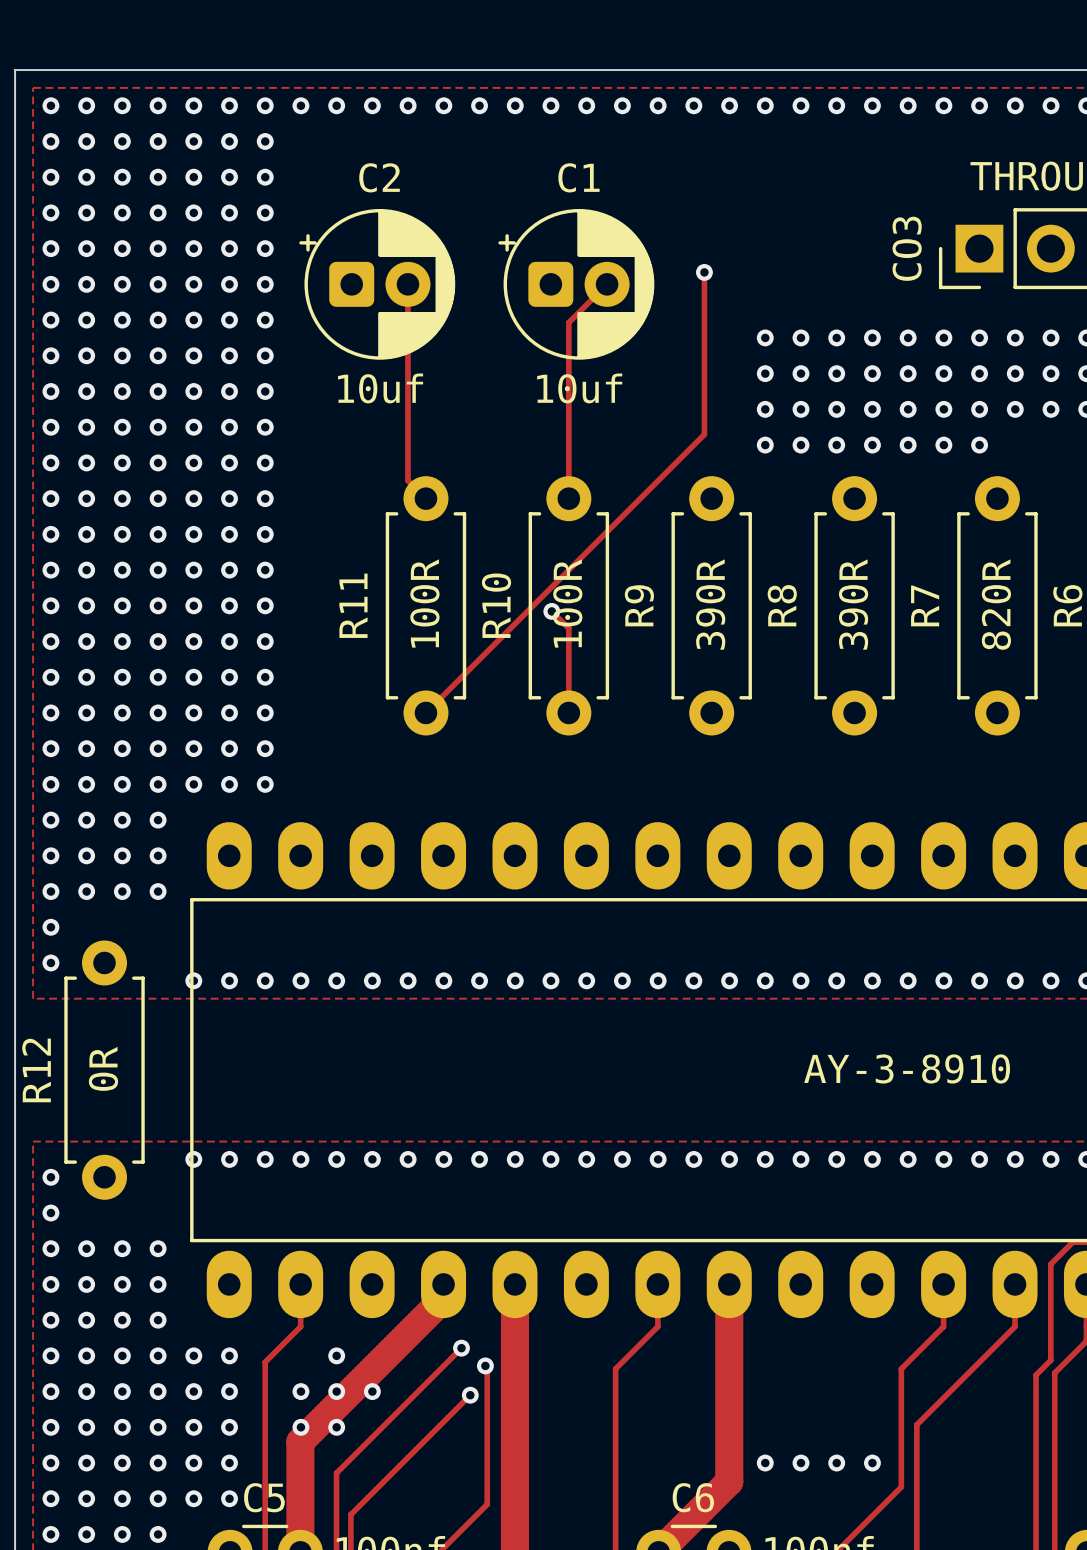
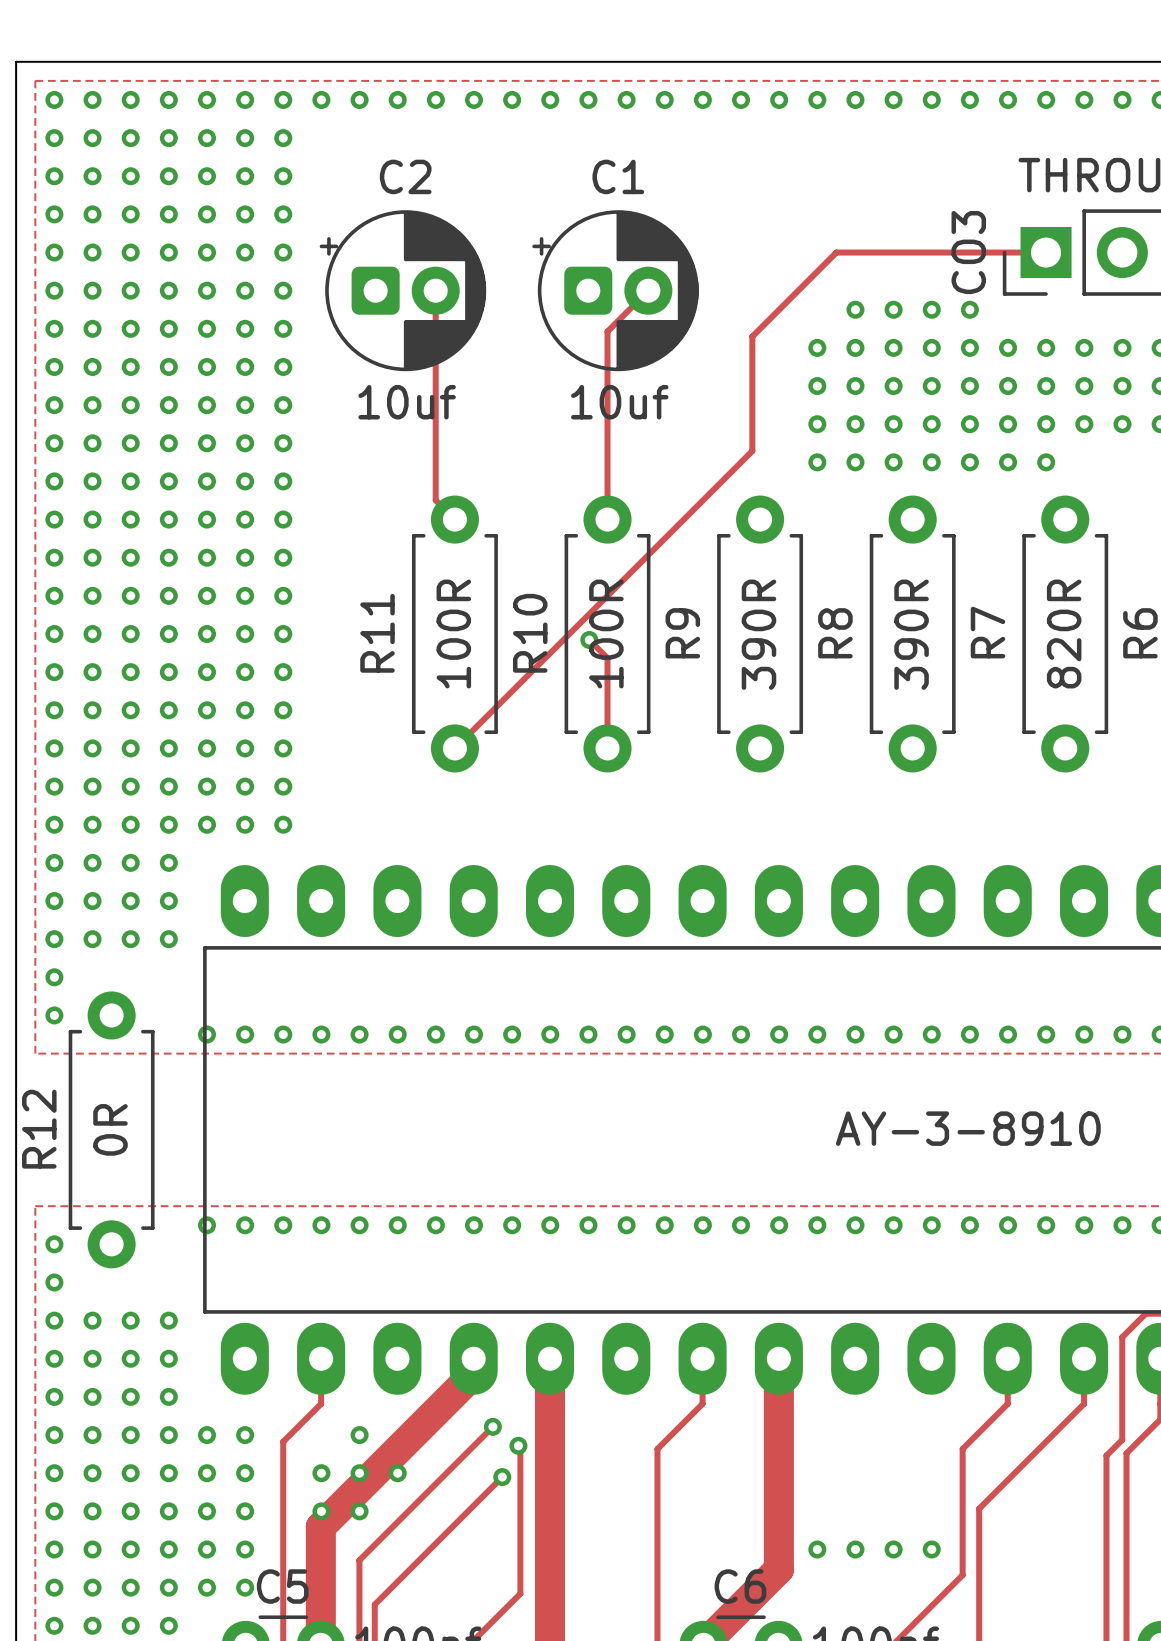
track: (704, 272) (704, 327) -> (1046, 252) (836, 252) (752, 336)
via: (704, 272) -> none
via: none -> (855, 309)
via: none -> (893, 309)
via: none -> (931, 309)
via: none -> (969, 309)

